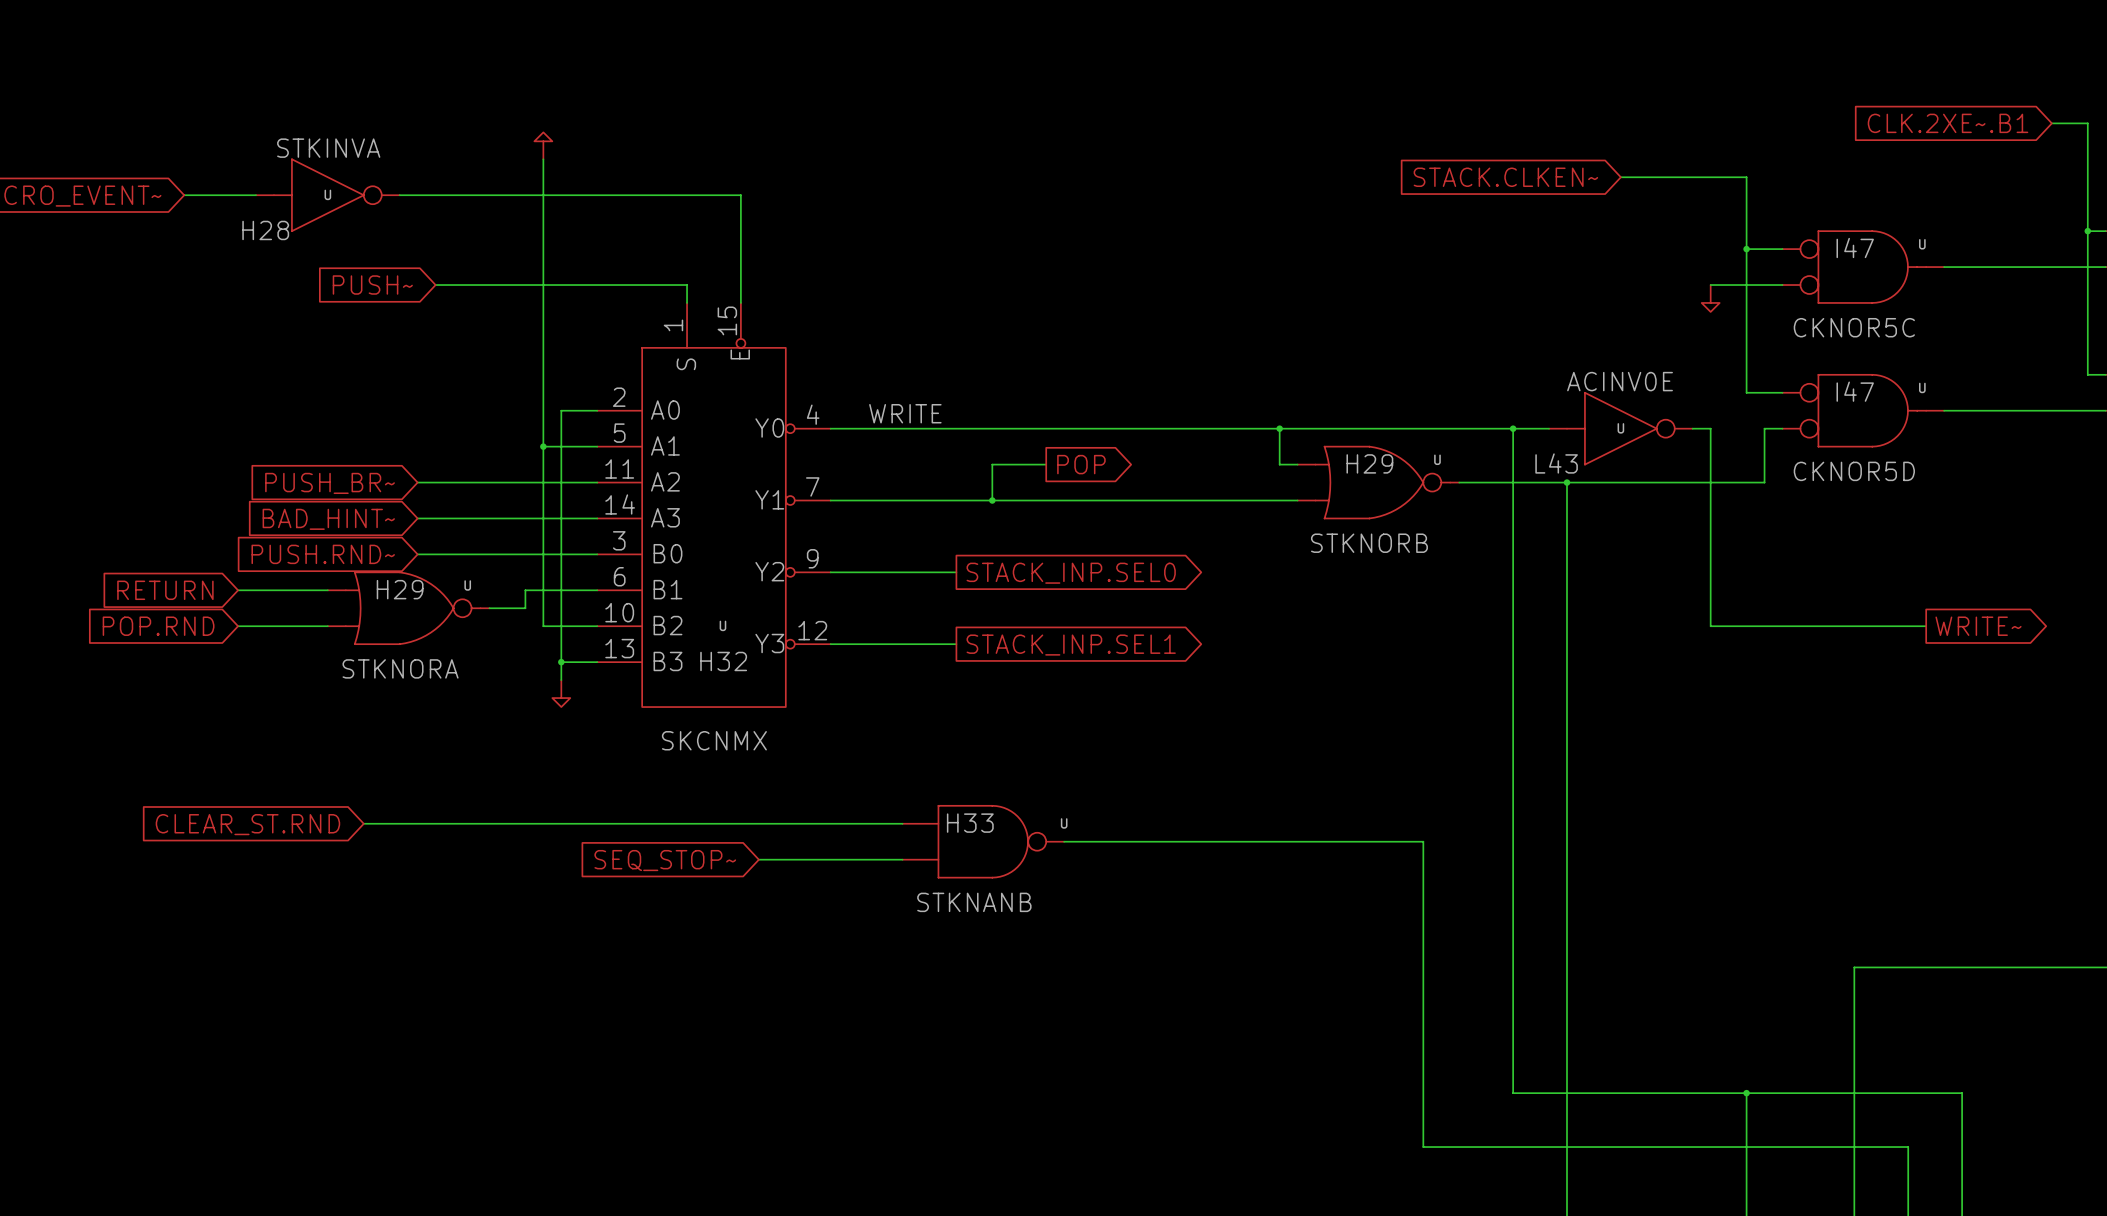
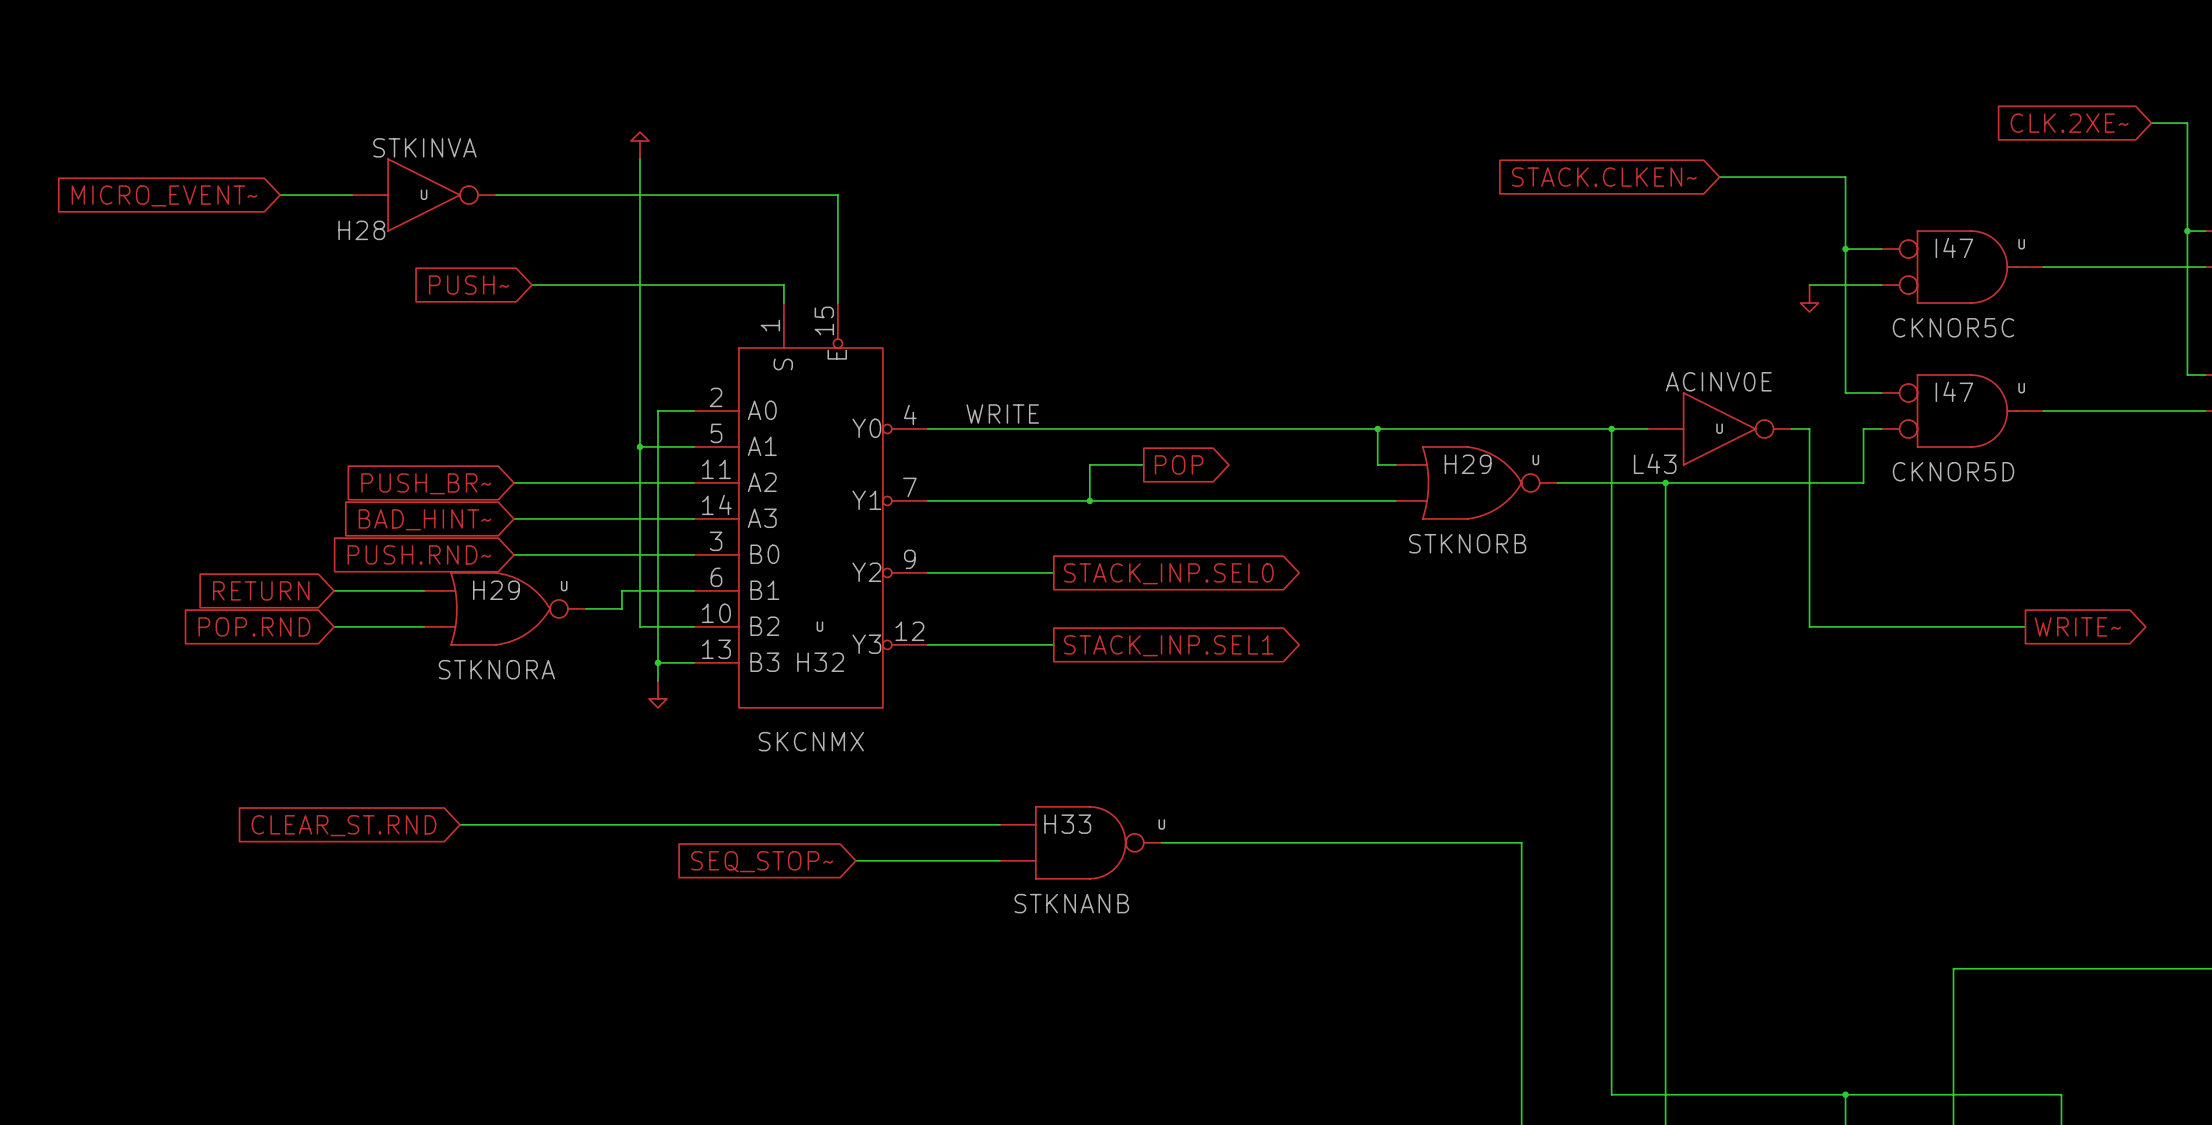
global label: CLK.2XE~.B1 (1948, 123) -> CLK.2XE~ (2069, 123)

